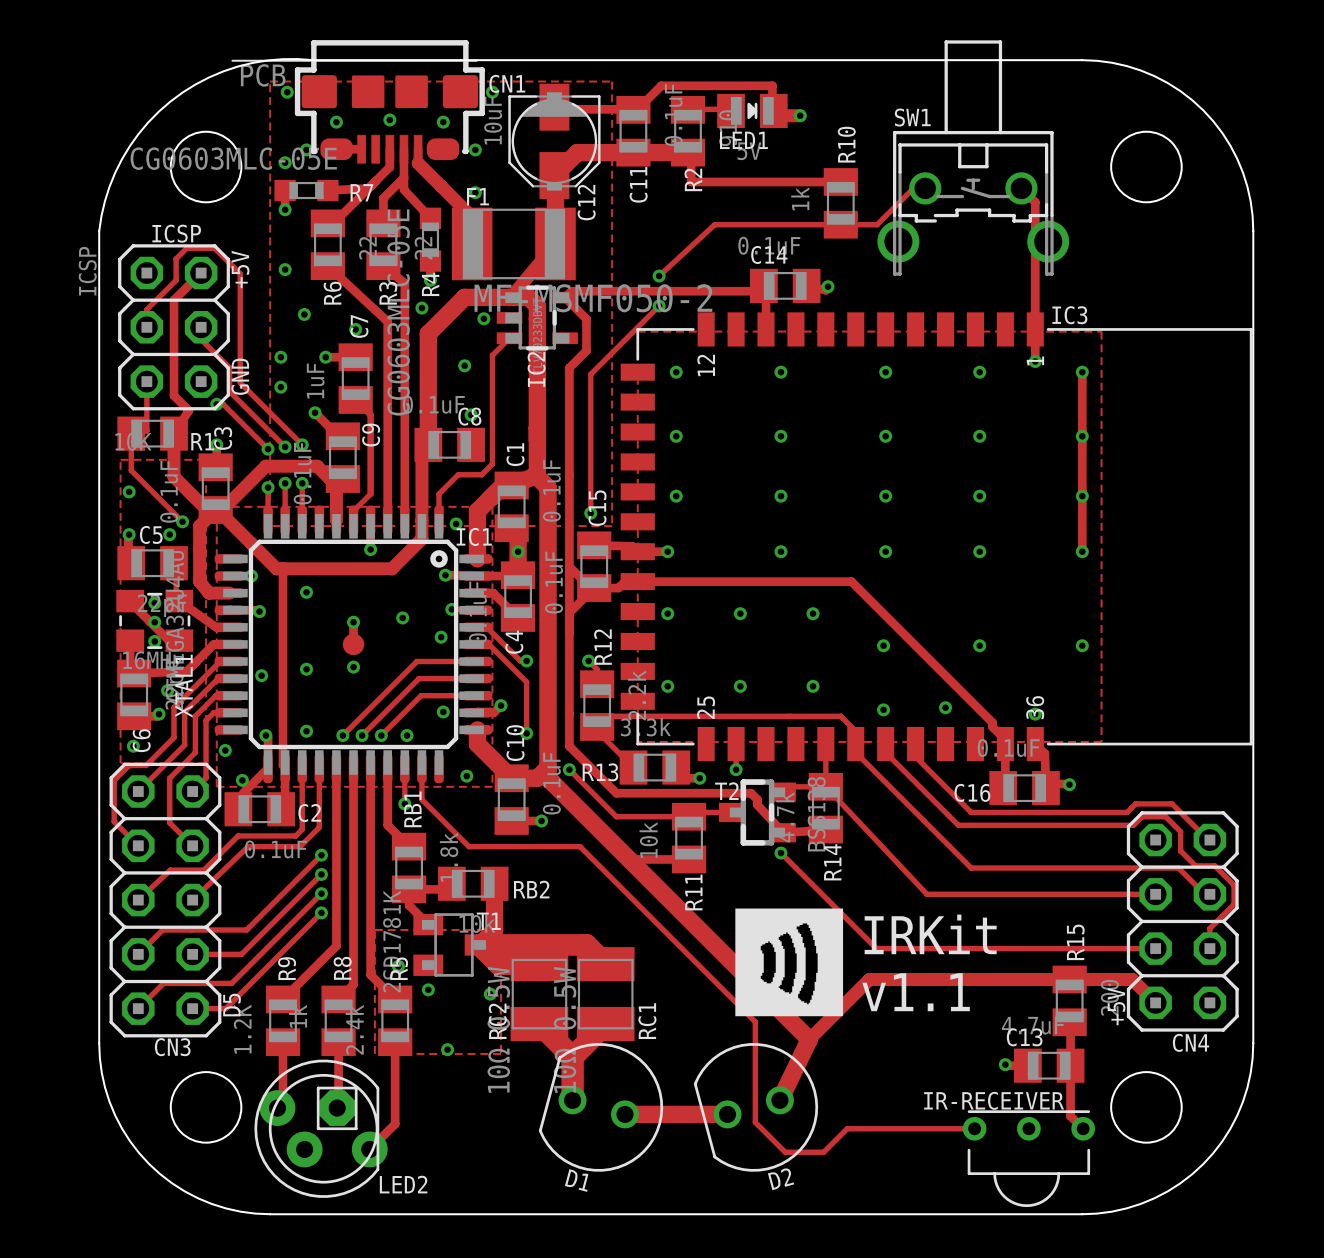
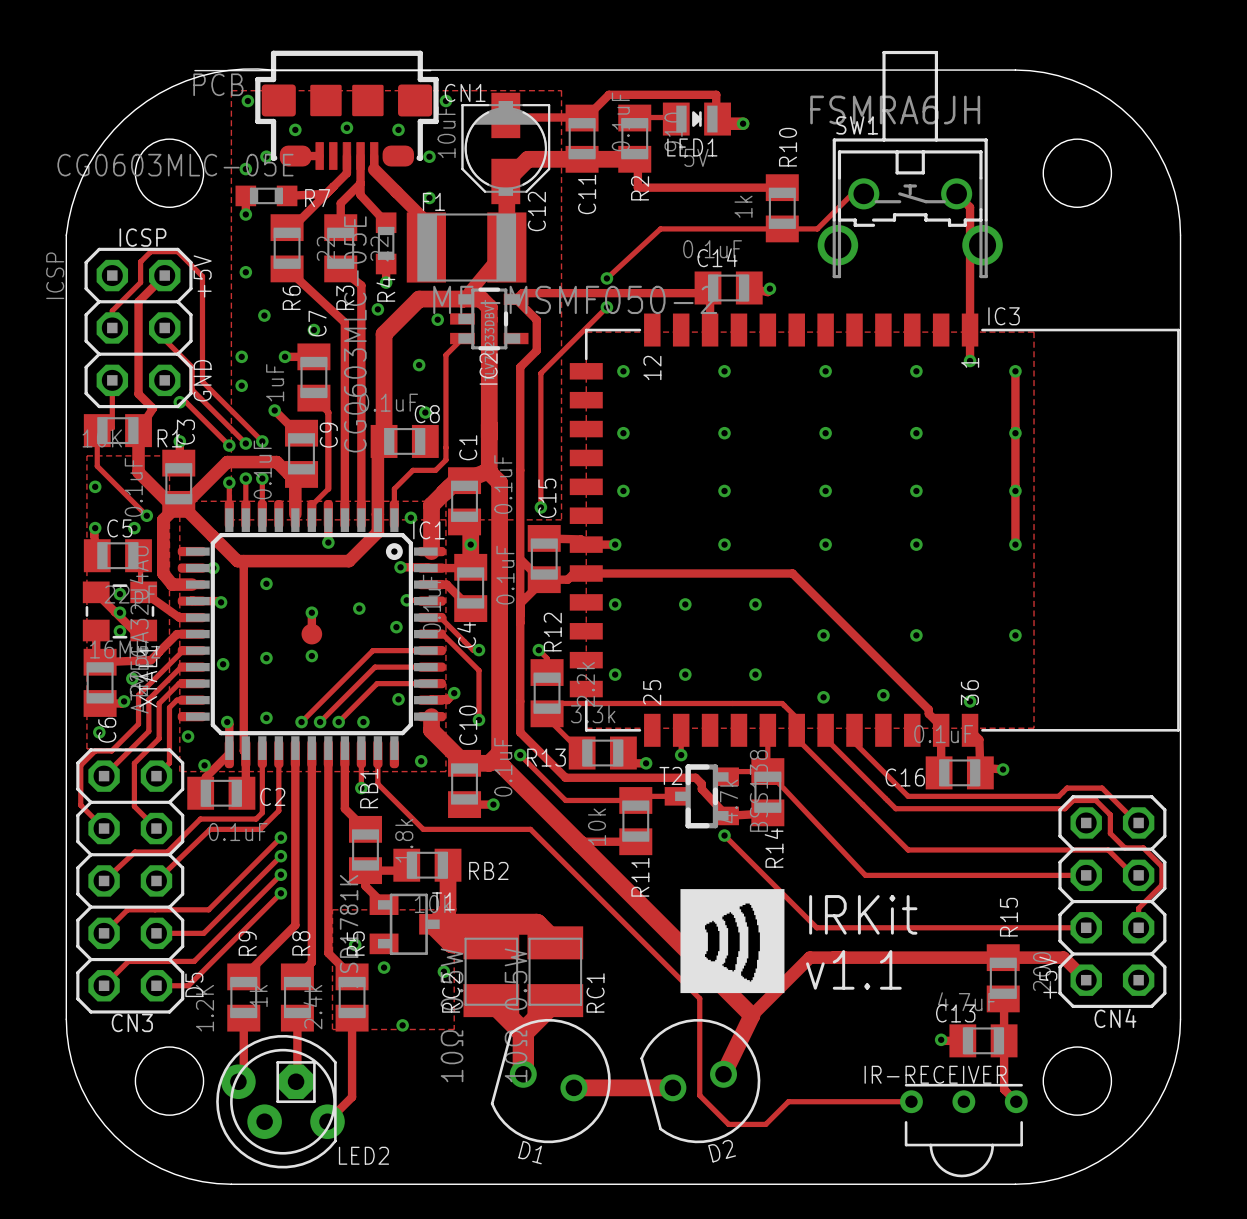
SW1 value: none -> FSMRA6JH (895, 110)

